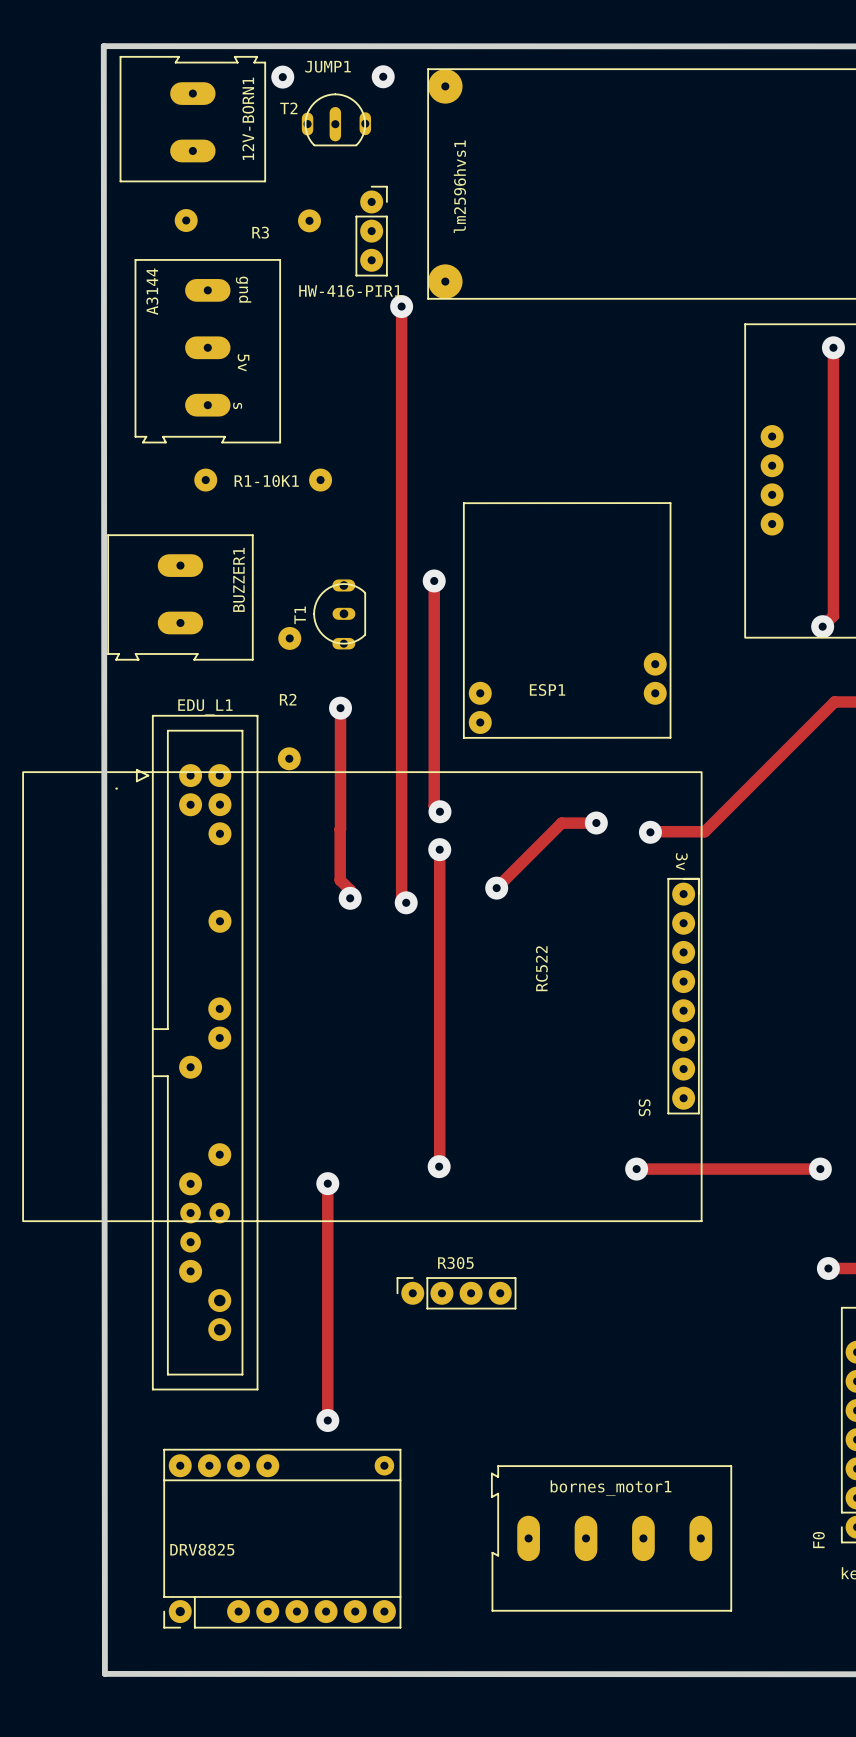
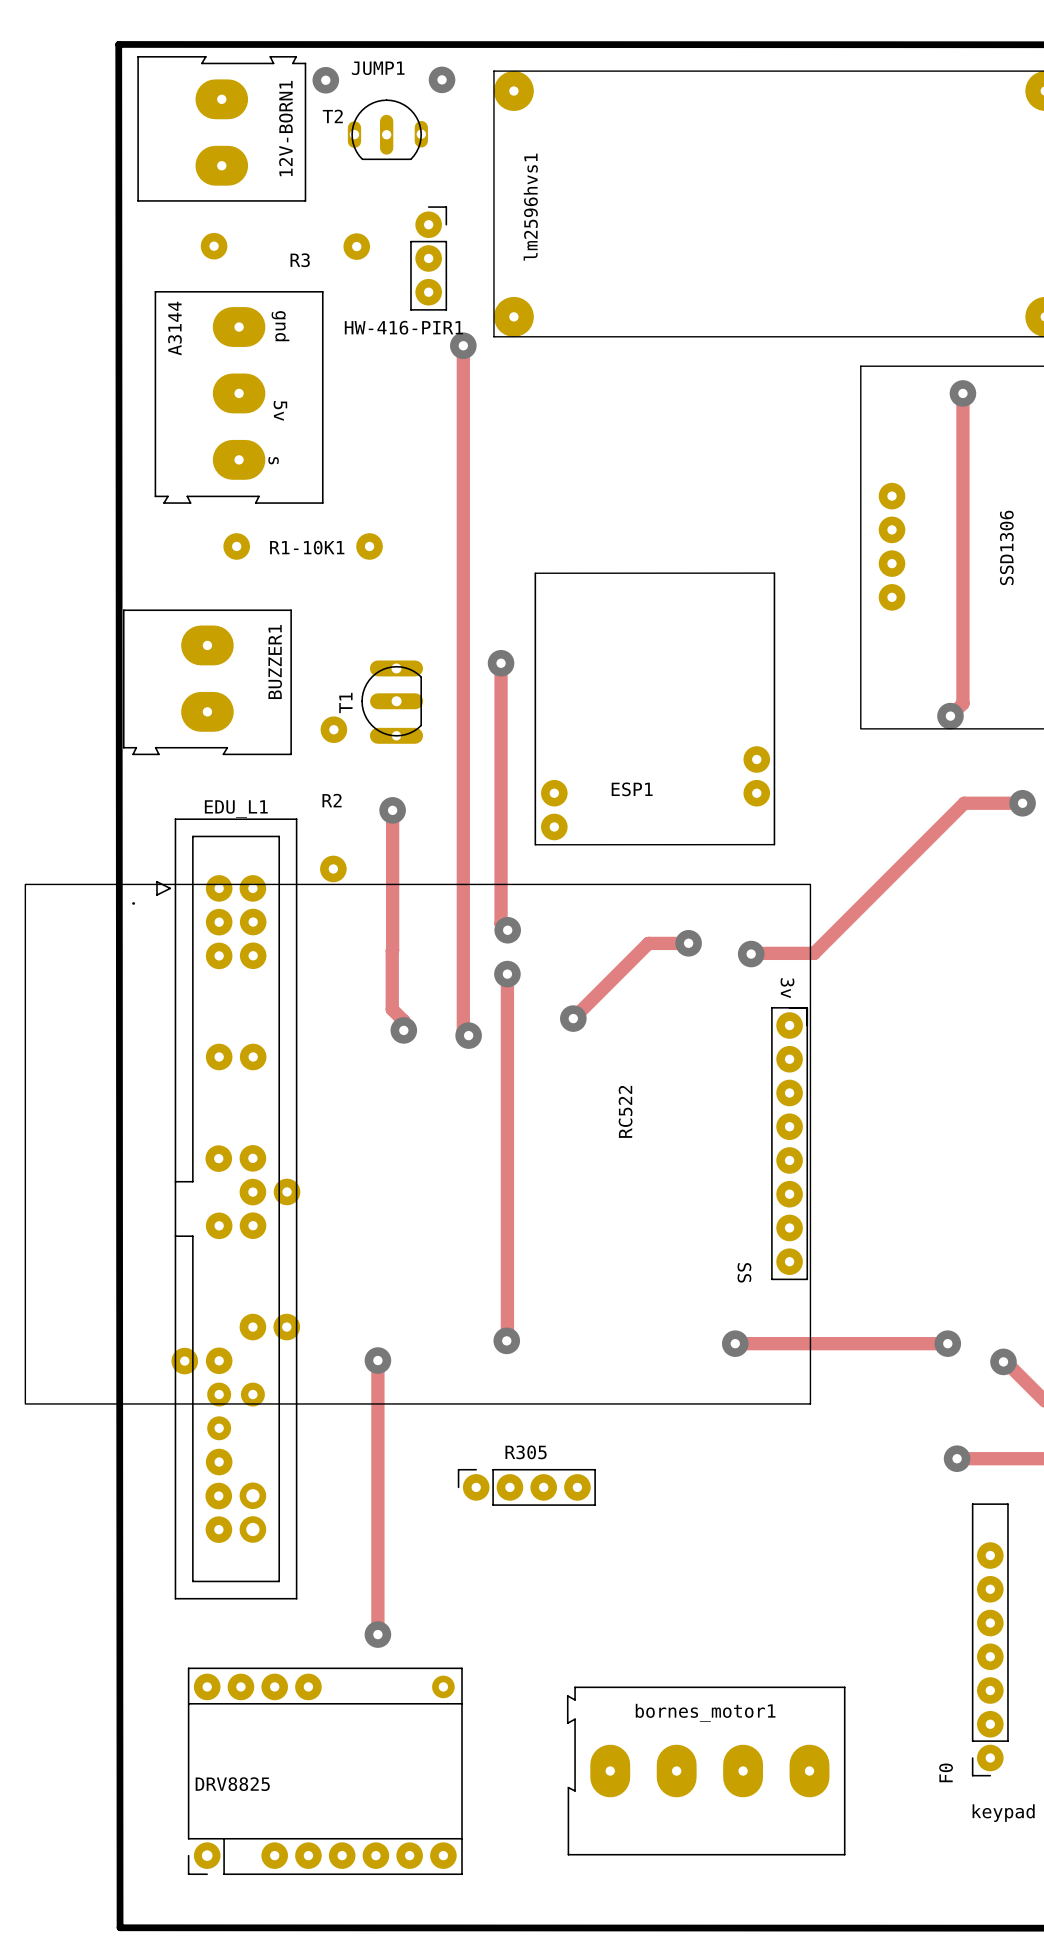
12V-BORN1 footprint: [119, 56, 266, 183] -> [137, 56, 307, 202]
A3144 footprint: [134, 259, 281, 444] -> [154, 291, 324, 504]
BUZZER1 footprint: [107, 534, 254, 661] -> [122, 609, 292, 756]
T1 footprint: [313, 579, 366, 650] -> [361, 660, 424, 744]
EDU_L1 footprint: [136, 715, 259, 1391] -> [156, 818, 301, 1600]
bornes_motor1 footprint: [491, 1465, 732, 1612] -> [566, 1686, 846, 1856]

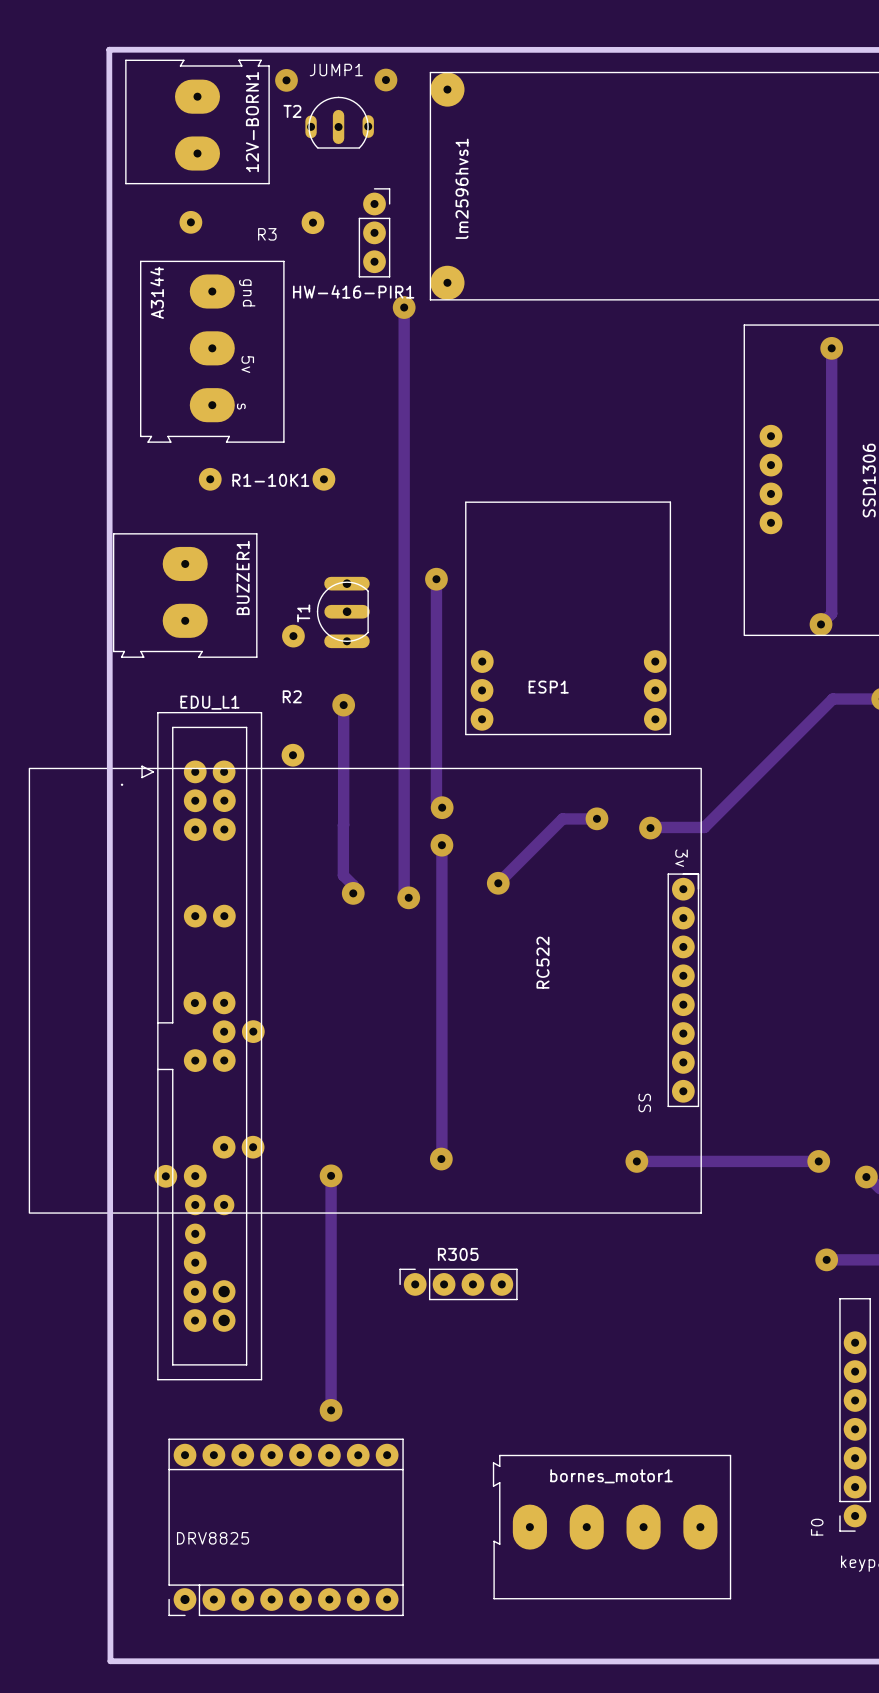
ESP1 footprint: [534, 572, 776, 846] -> [465, 501, 672, 736]
part footprint: [187, 1667, 463, 1876] -> [168, 1438, 404, 1617]

